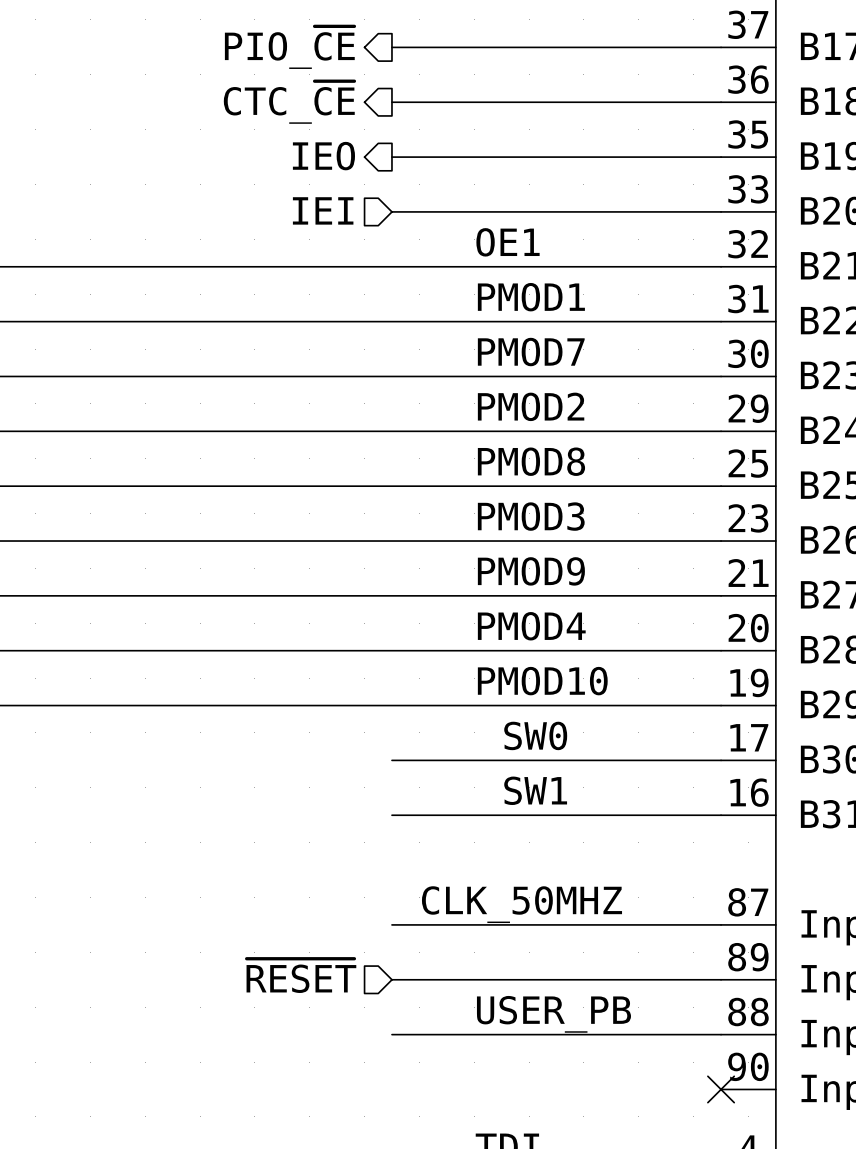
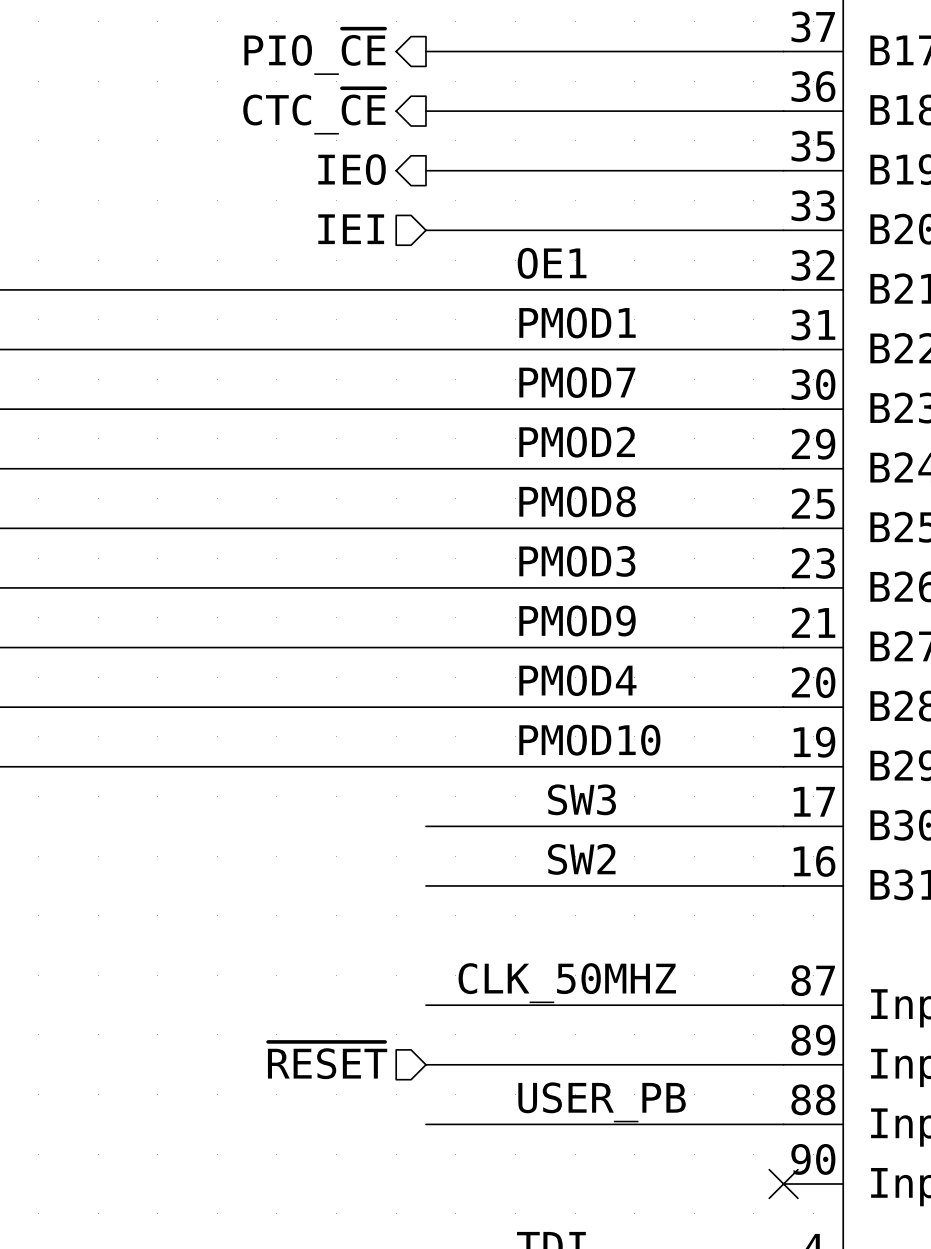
label: SW0 (535, 735) -> SW3 (581, 799)
label: SW1 (535, 790) -> SW2 (581, 859)

